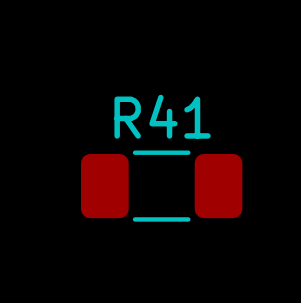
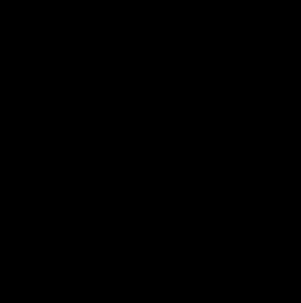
R41: (161, 186) -> none

